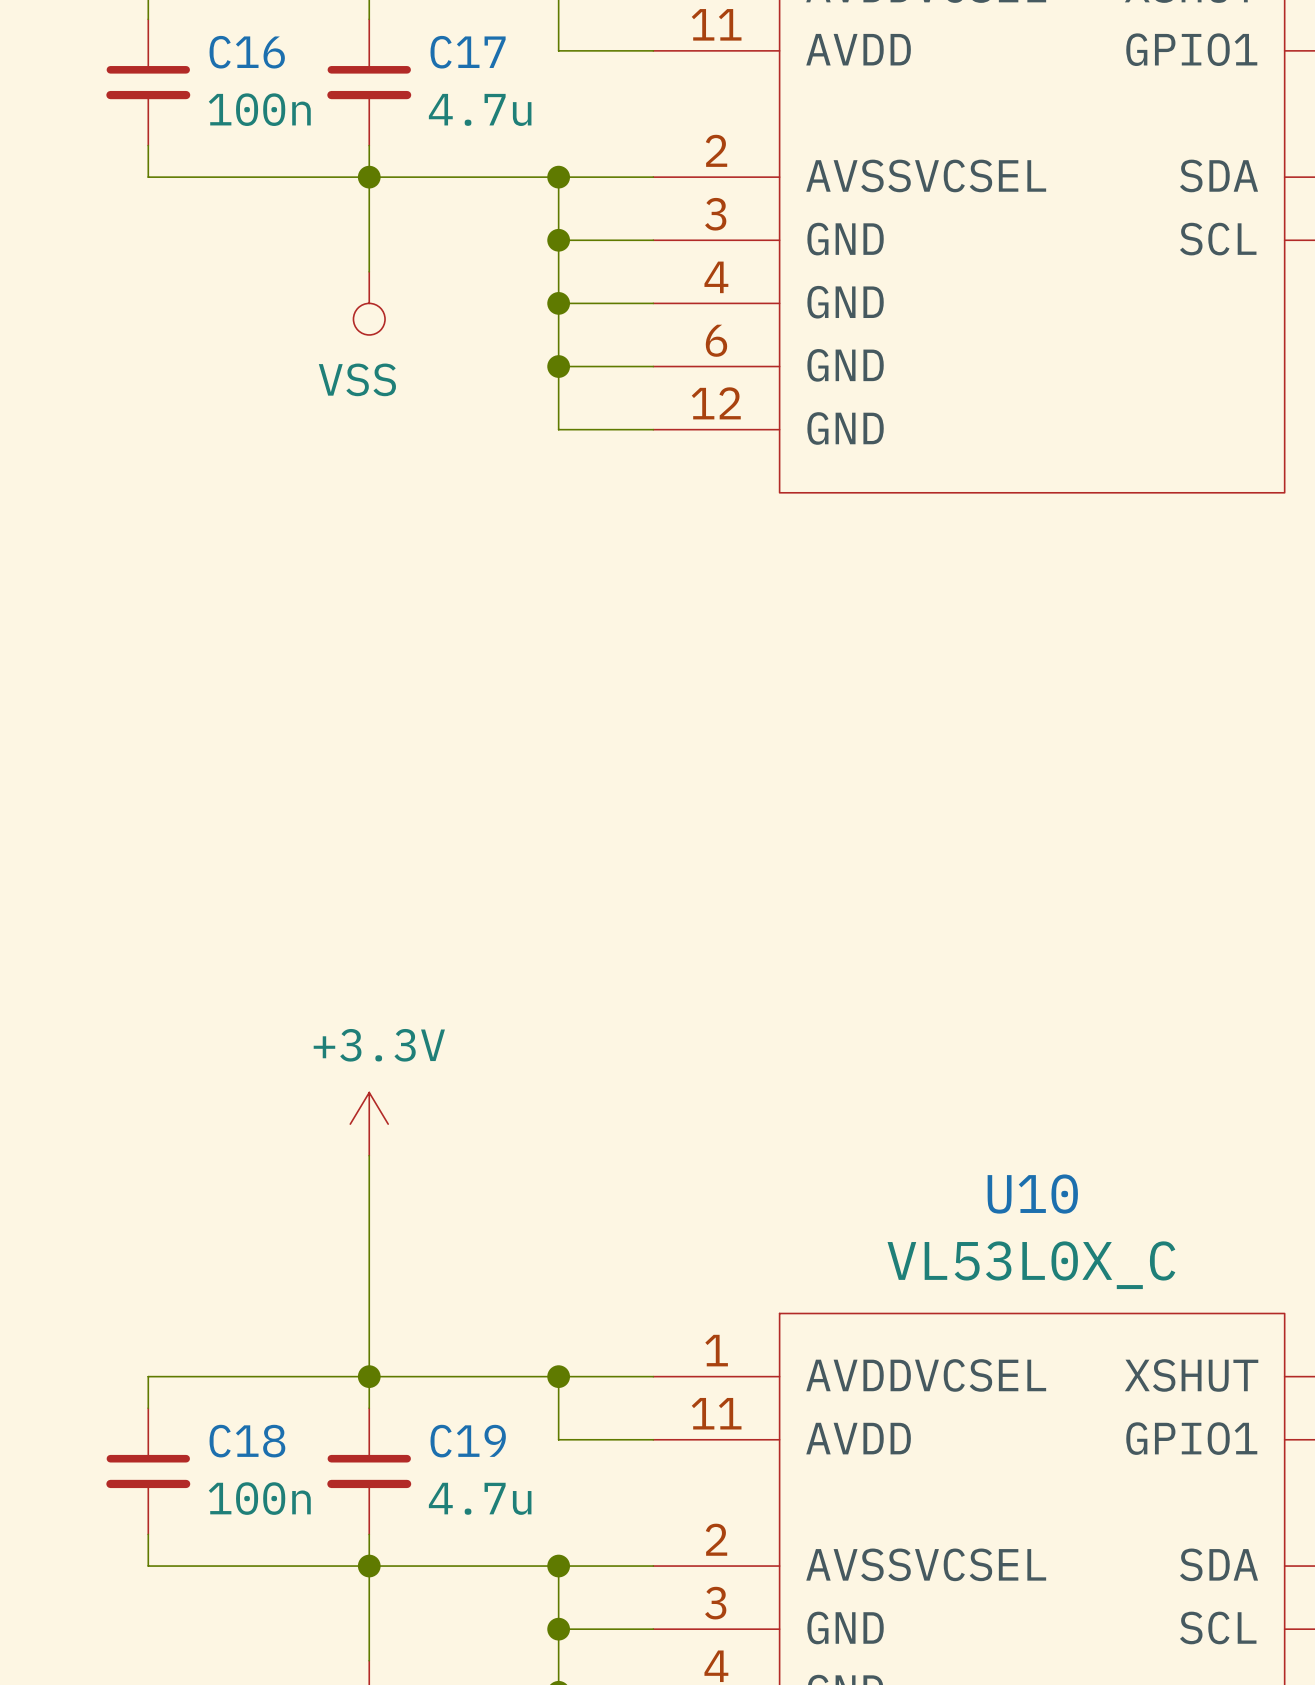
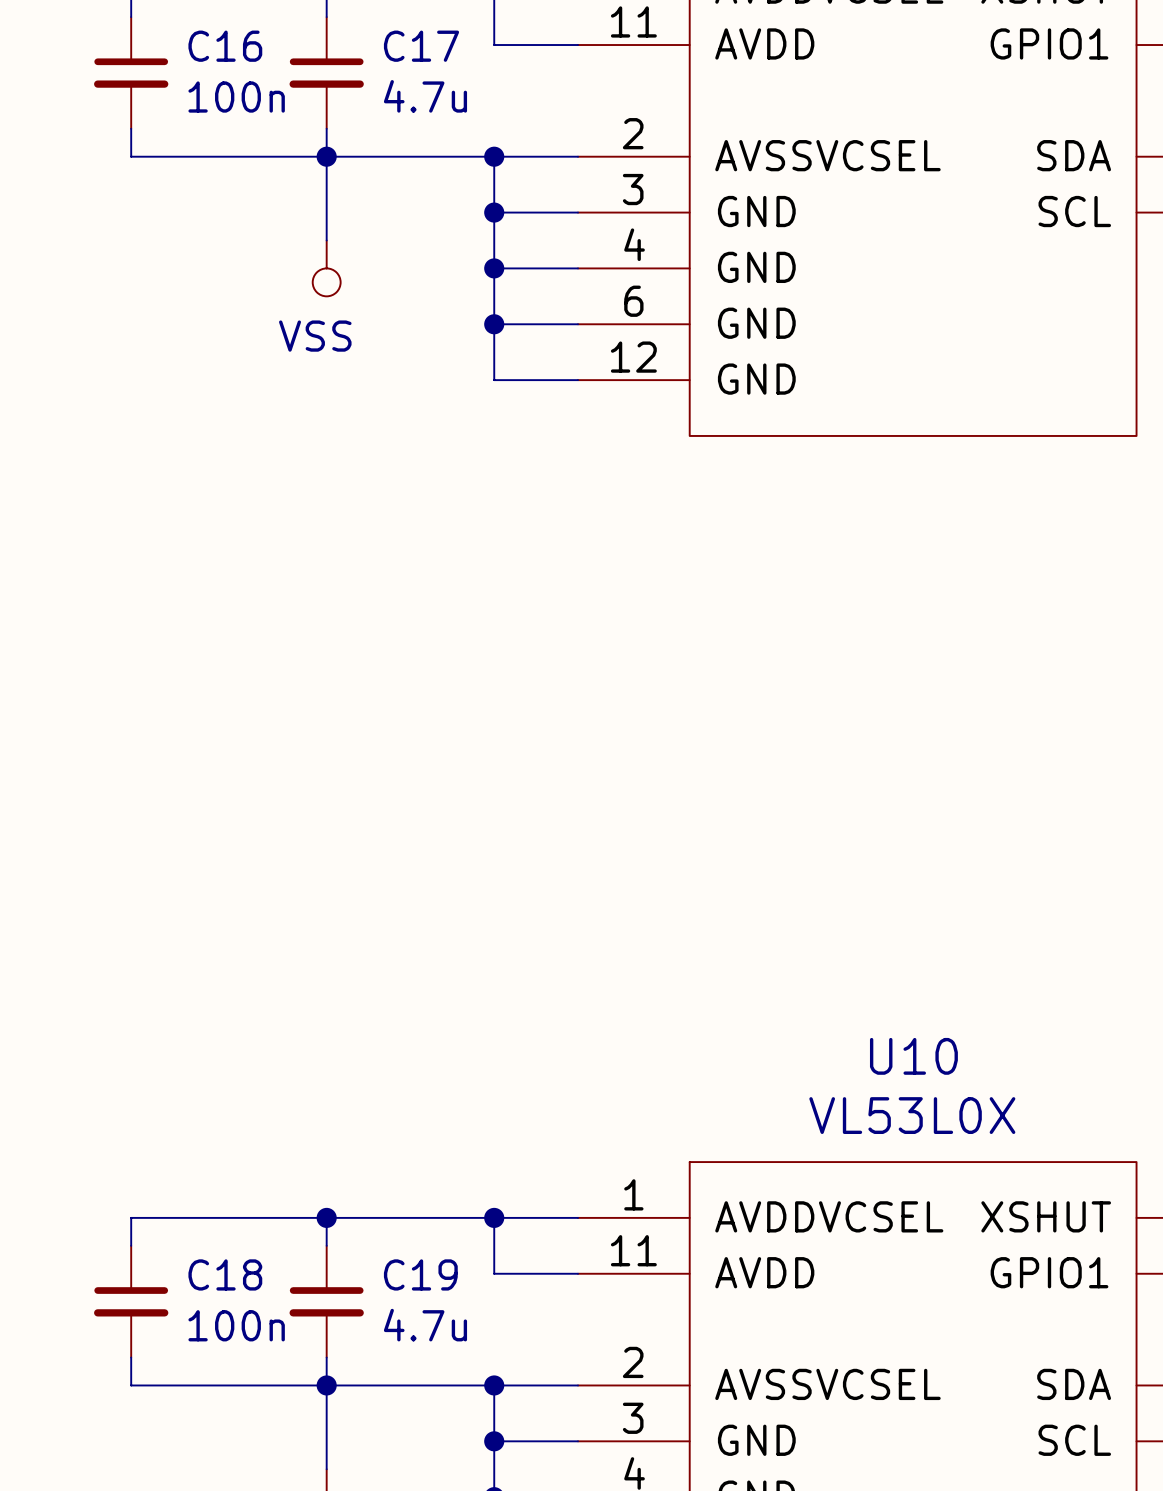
power symbol: +3.3V (369, 1124) -> none
wire: (369, 1155) (369, 1376) -> none
U10 value: VL53L0X_C (1031, 1265) -> VL53L0X (912, 1115)

